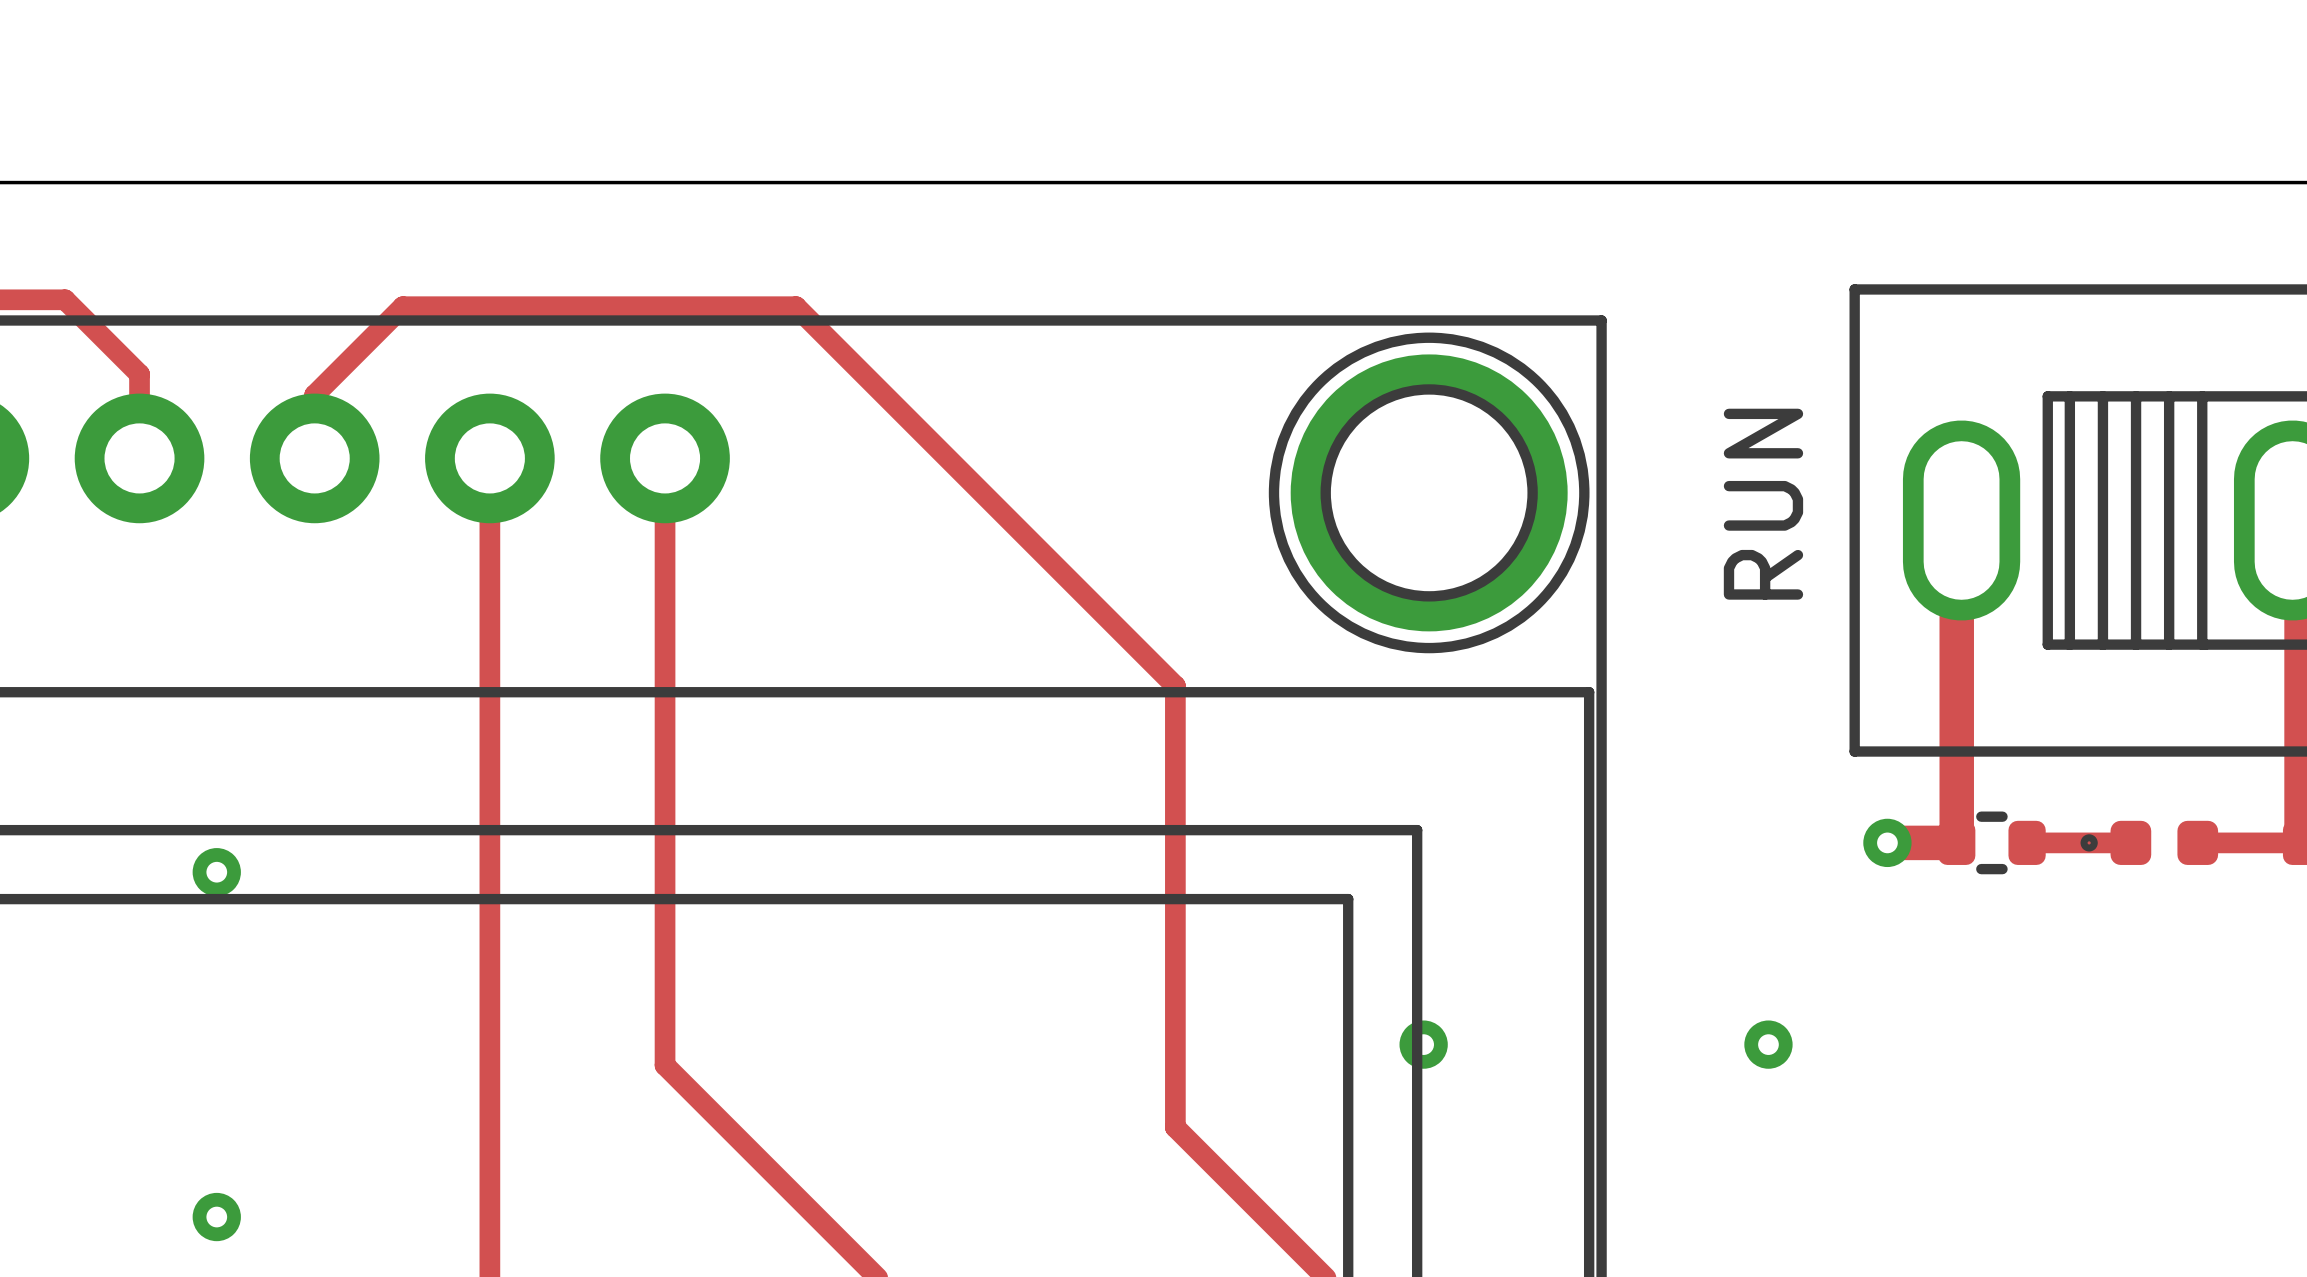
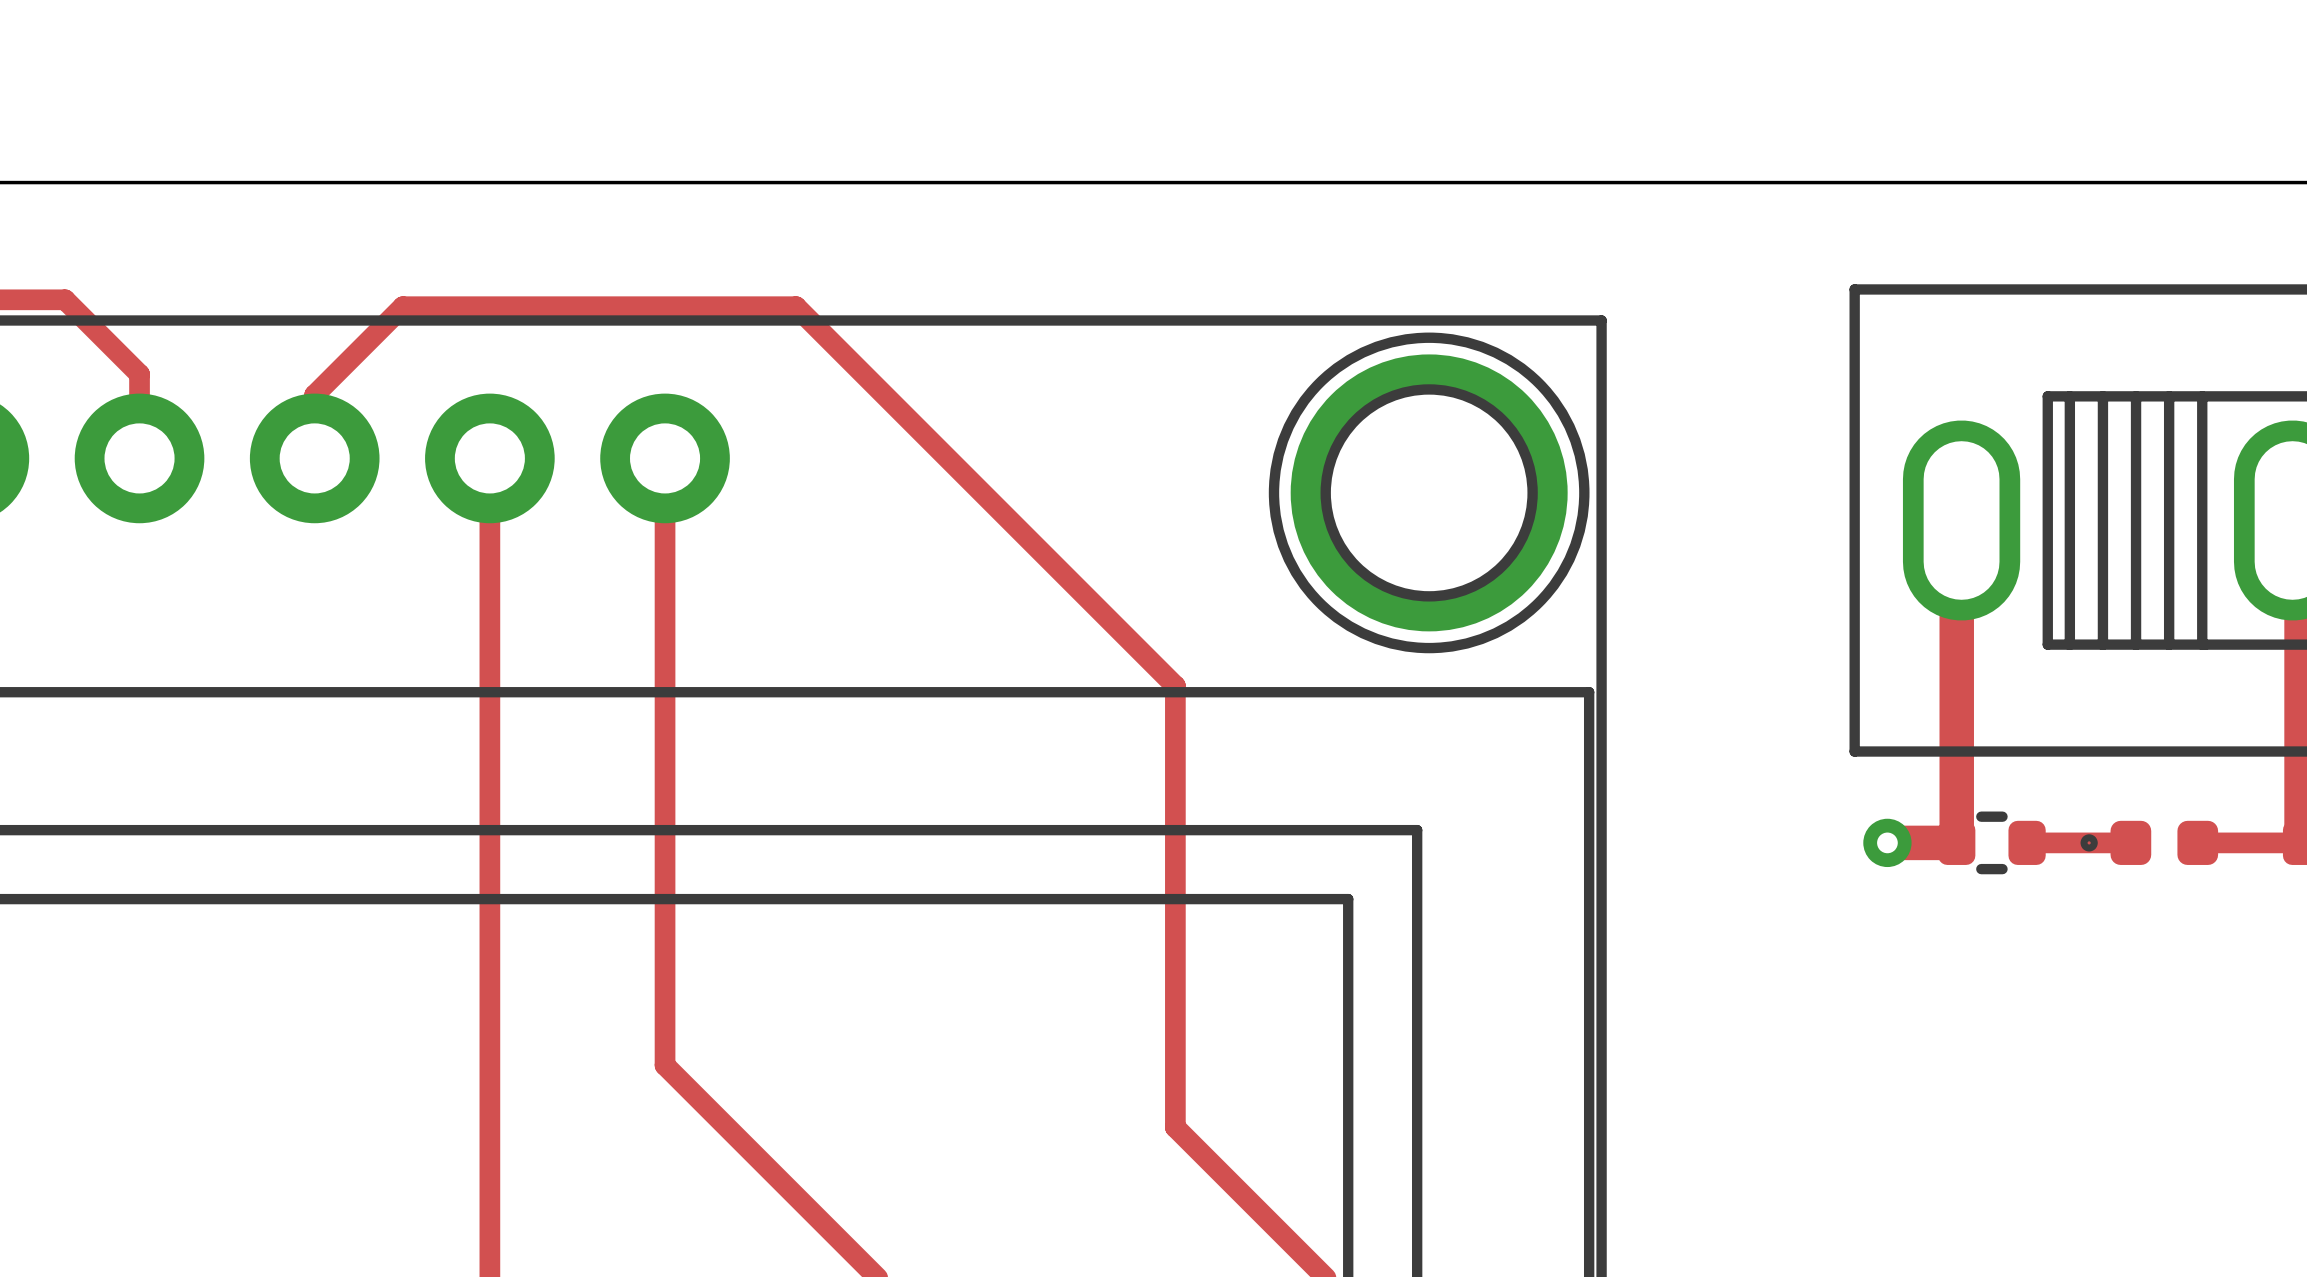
text: RUN (1763, 504) -> none
via: (216, 872) -> none
via: (1423, 1044) -> none
via: (1768, 1044) -> none
via: (216, 1217) -> none

